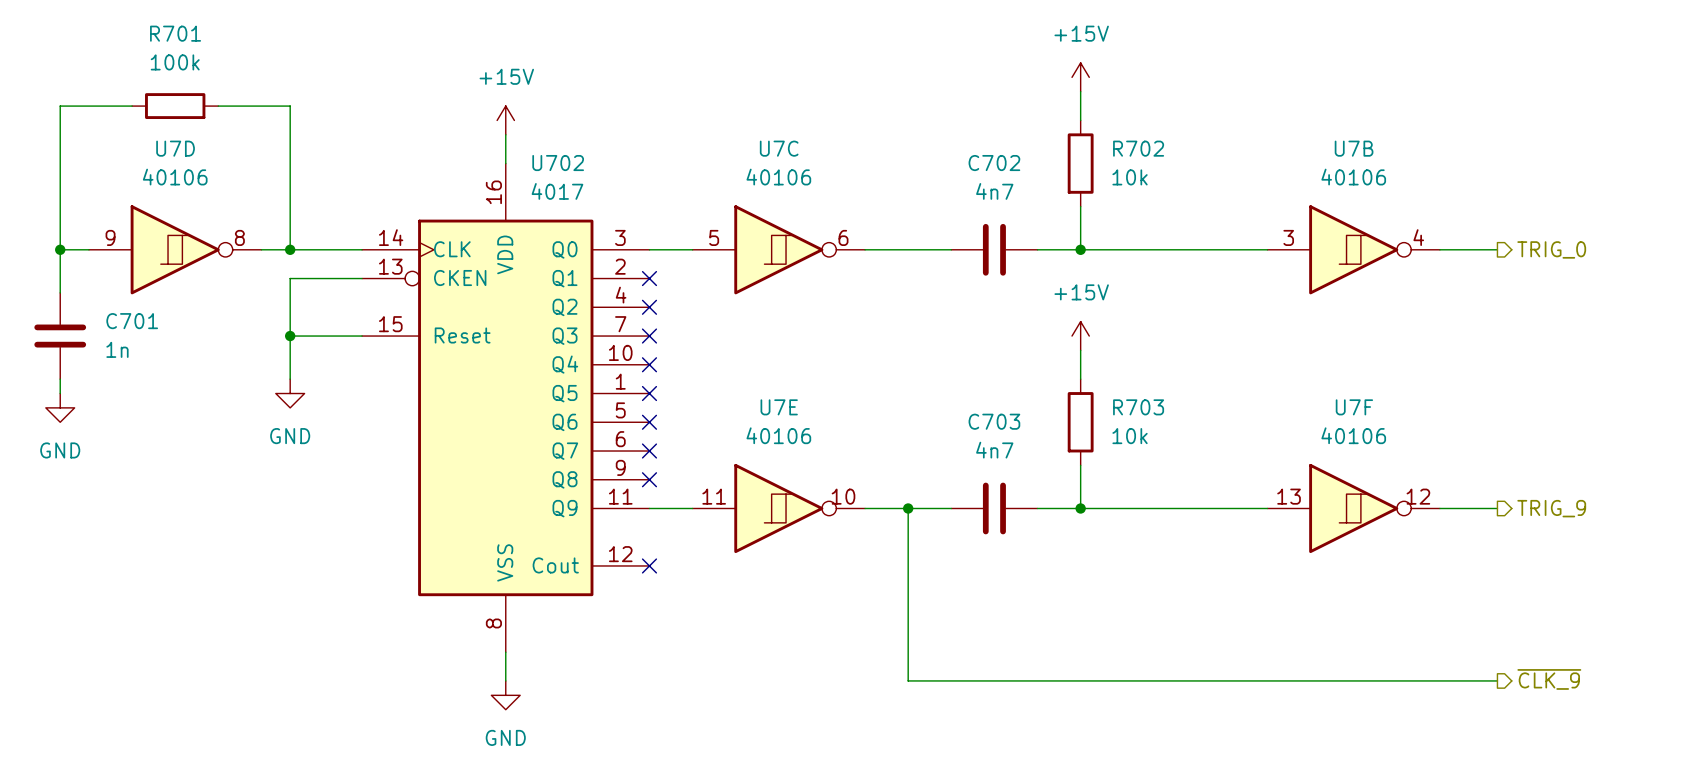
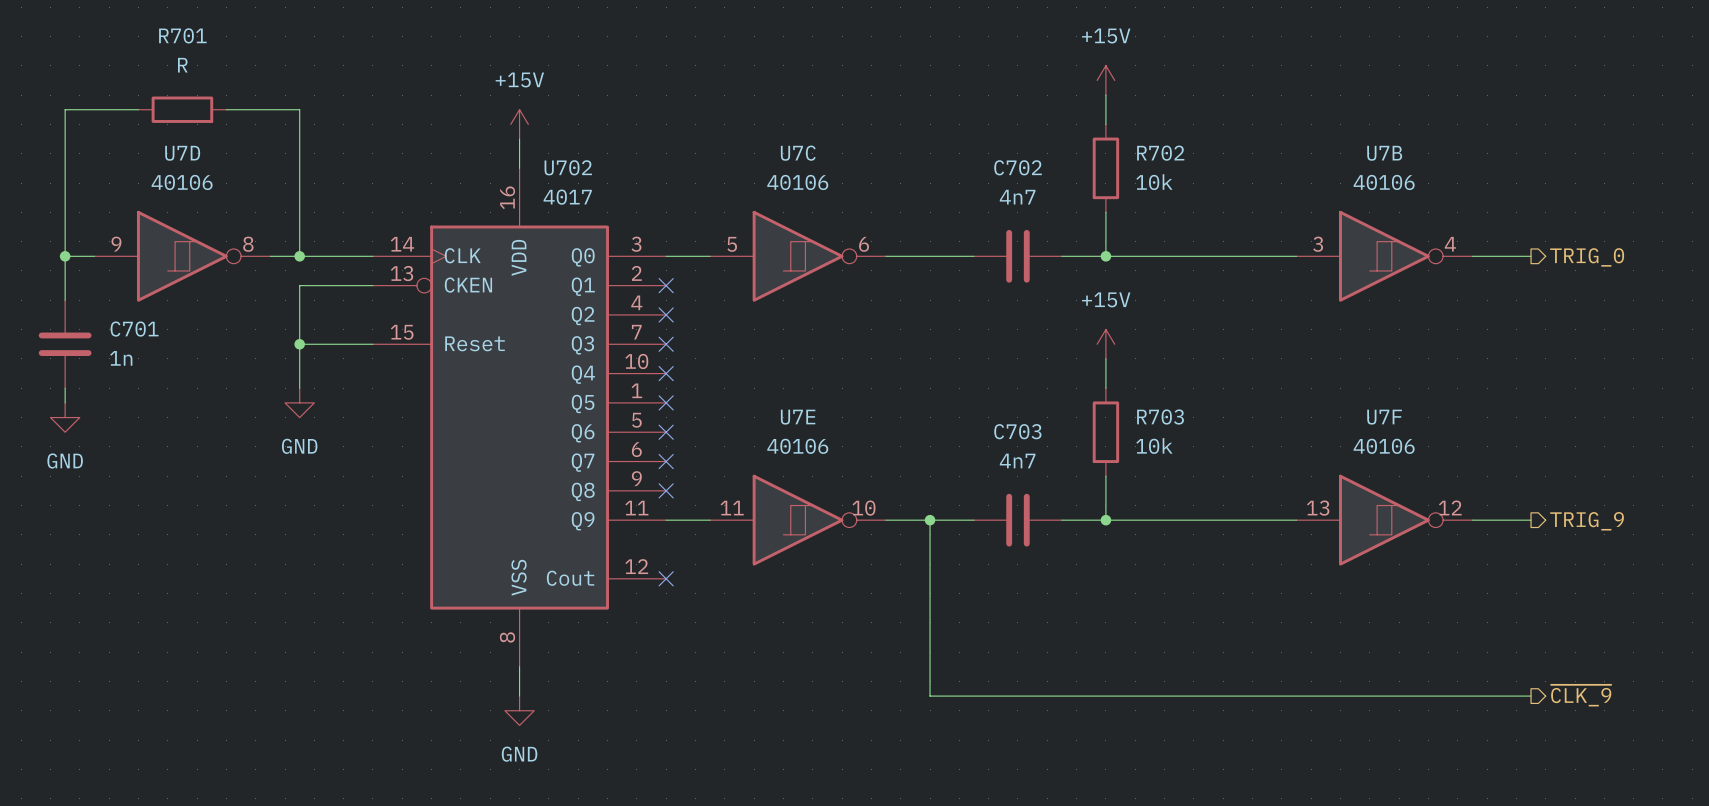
R701 value: 100k (175, 62) -> R (182, 65)

